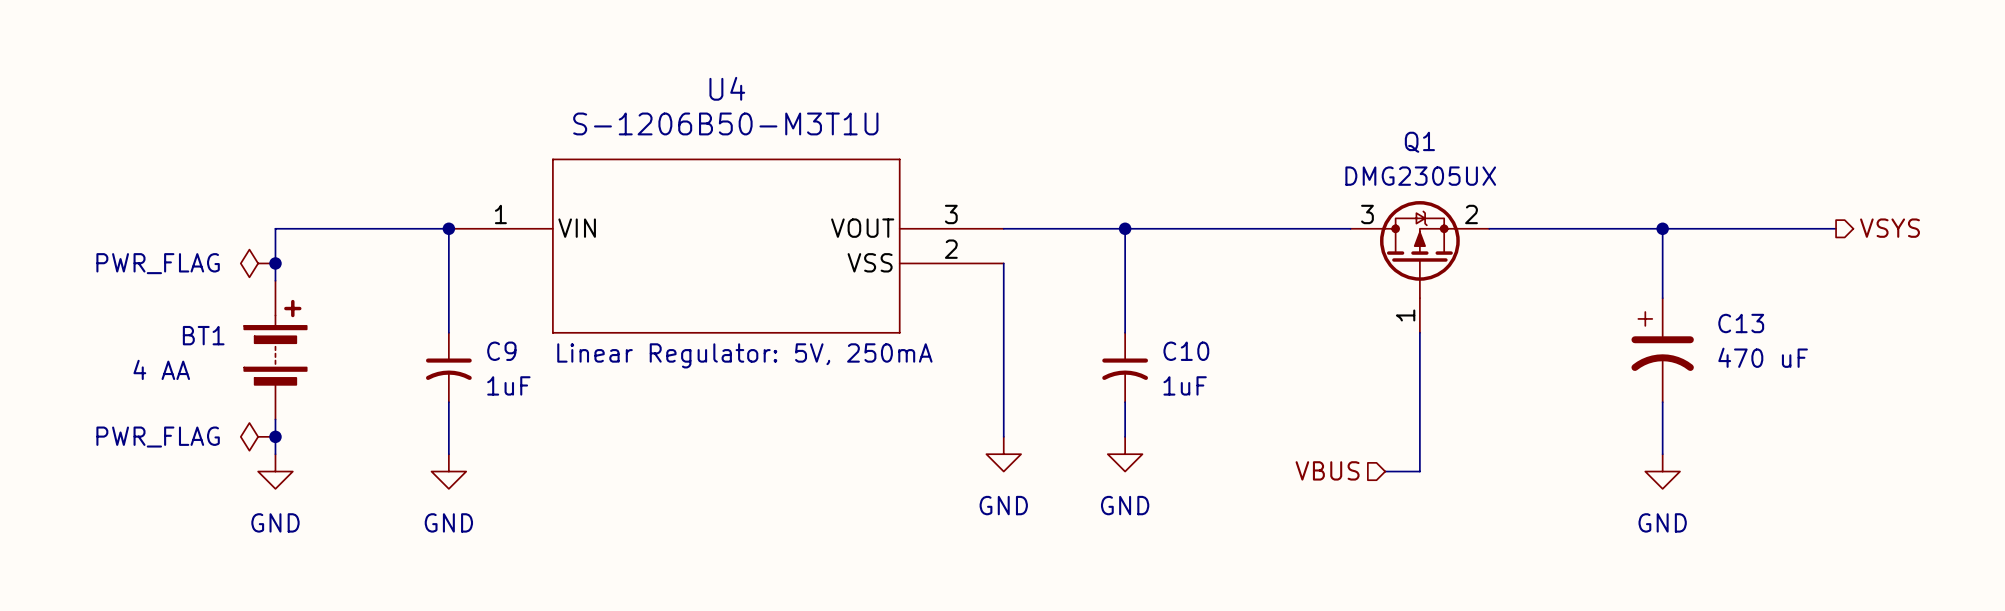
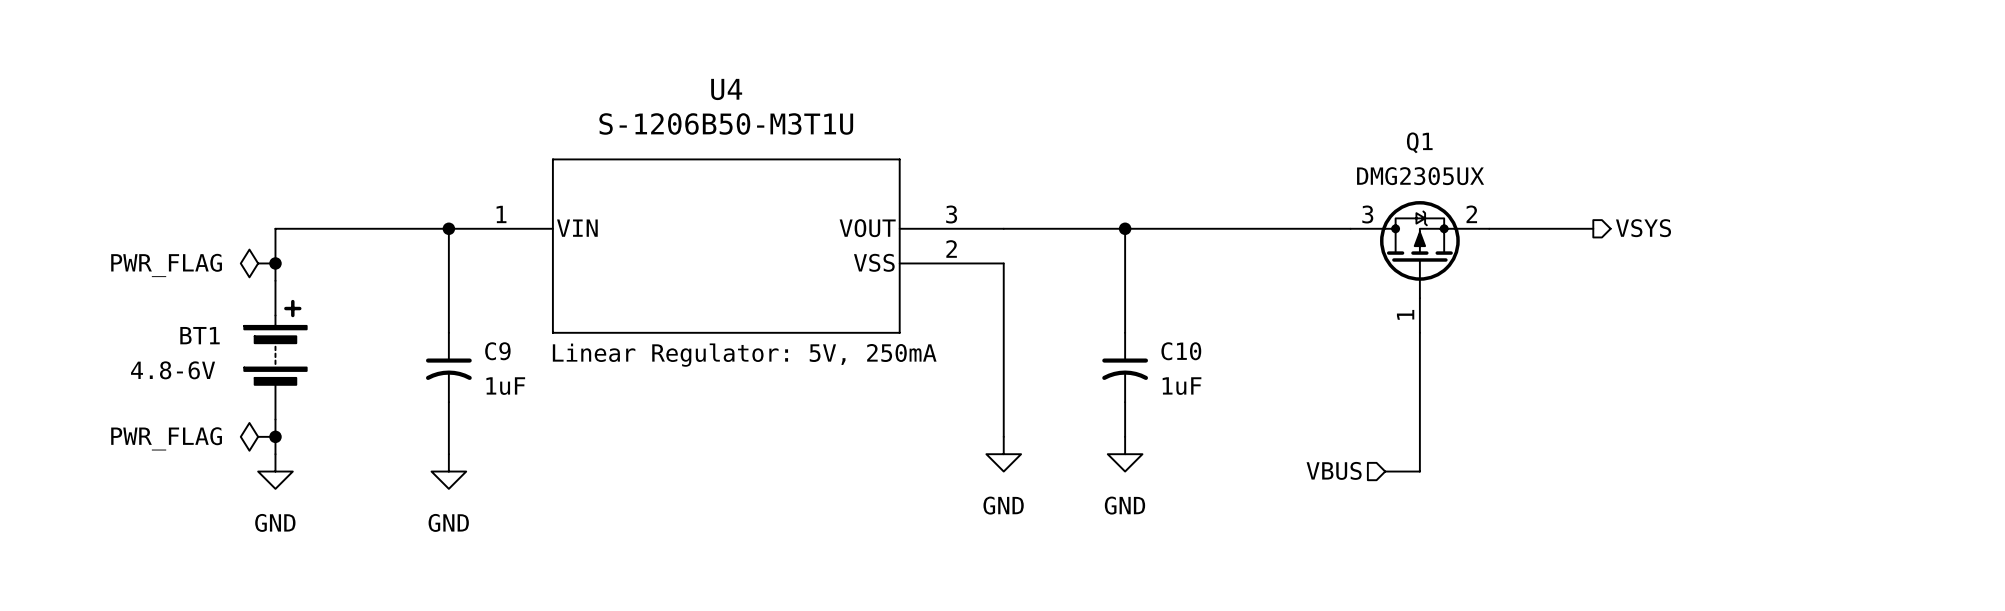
wire: (1593, 228) (1836, 228) -> none
wire: (1662, 228) (1662, 298) -> none
junction: (1662, 228) -> none
hierarchical label position: VSYS (1889, 228) -> VSYS (1643, 228)
C13: 470 uF (1662, 350) -> none
BT1 value: 4 AA (161, 369) -> 4.8-6V (173, 370)
wire: (1662, 402) (1662, 454) -> none
power symbol: GND (1662, 471) -> none

